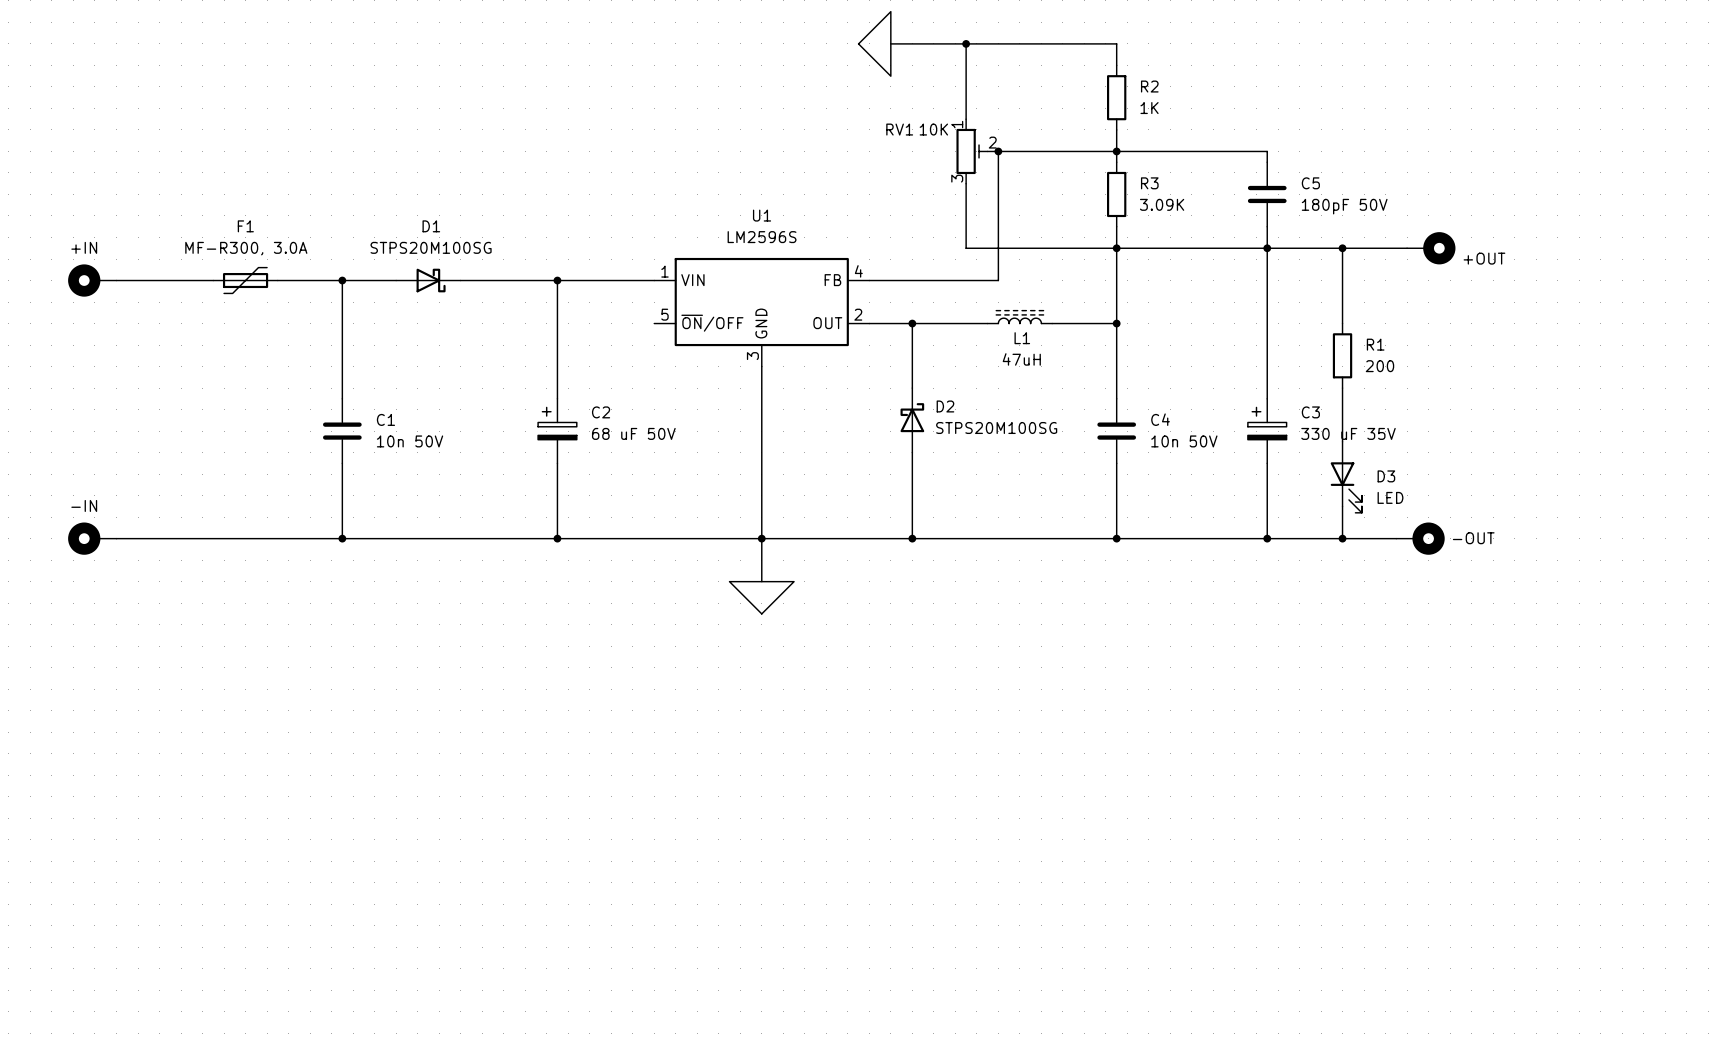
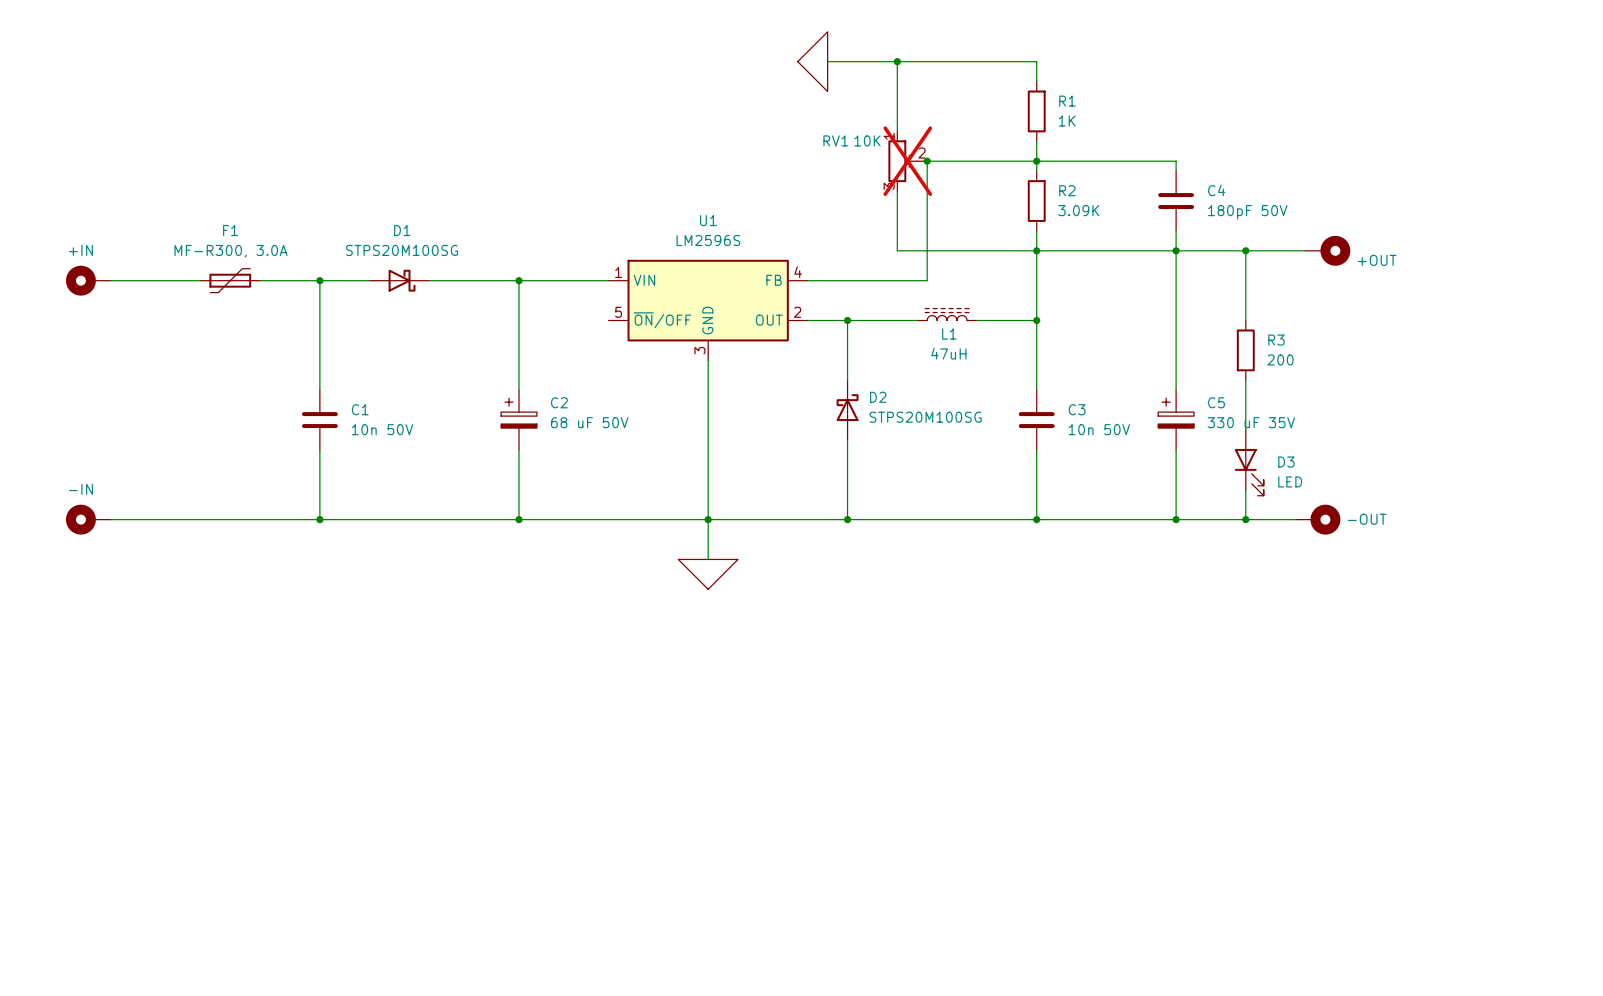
R2 name: R2 (1149, 86) -> R1 (1067, 101)
RV1 do-not-place cross: none -> (907, 161)
R3 name: R3 (1149, 183) -> R2 (1067, 190)
C5 name: C5 (1310, 183) -> C4 (1216, 190)
R1 name: R1 (1375, 344) -> R3 (1276, 340)
C3 name: C3 (1310, 412) -> C5 (1216, 402)
C4 name: C4 (1160, 419) -> C3 (1077, 409)

